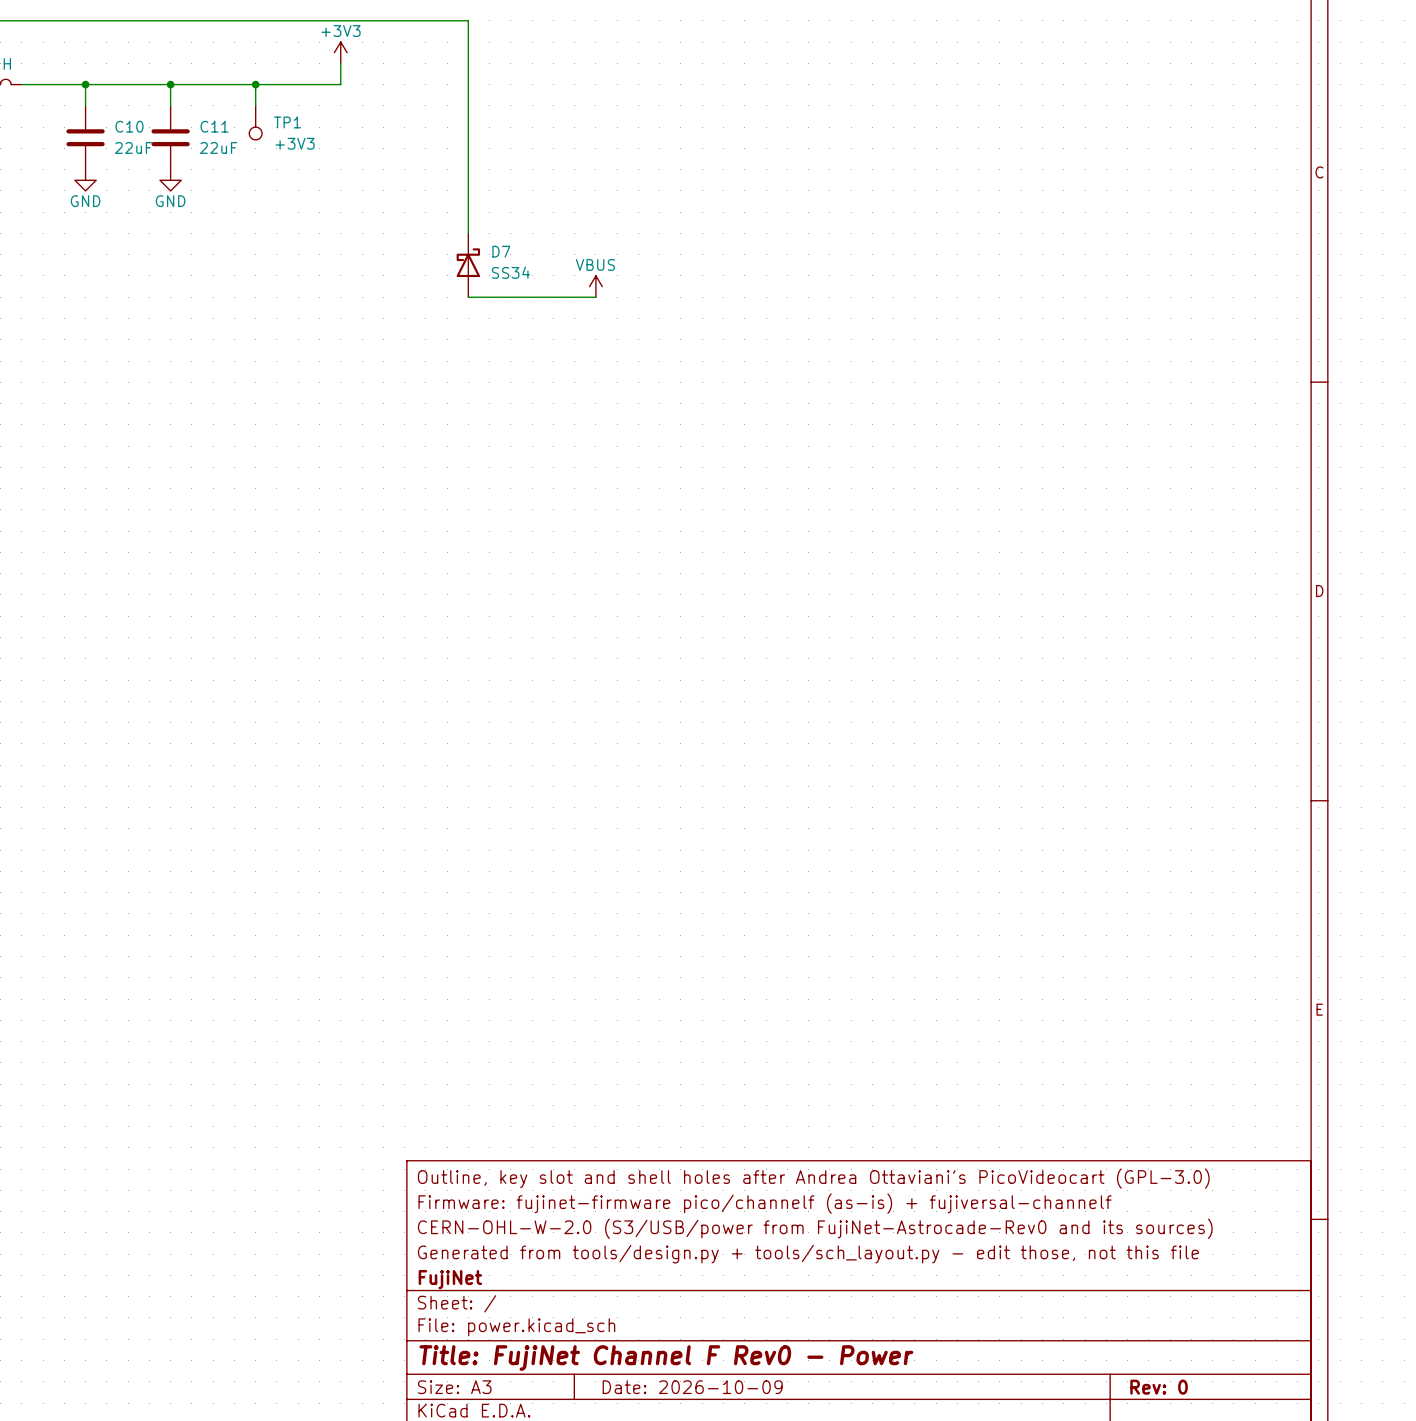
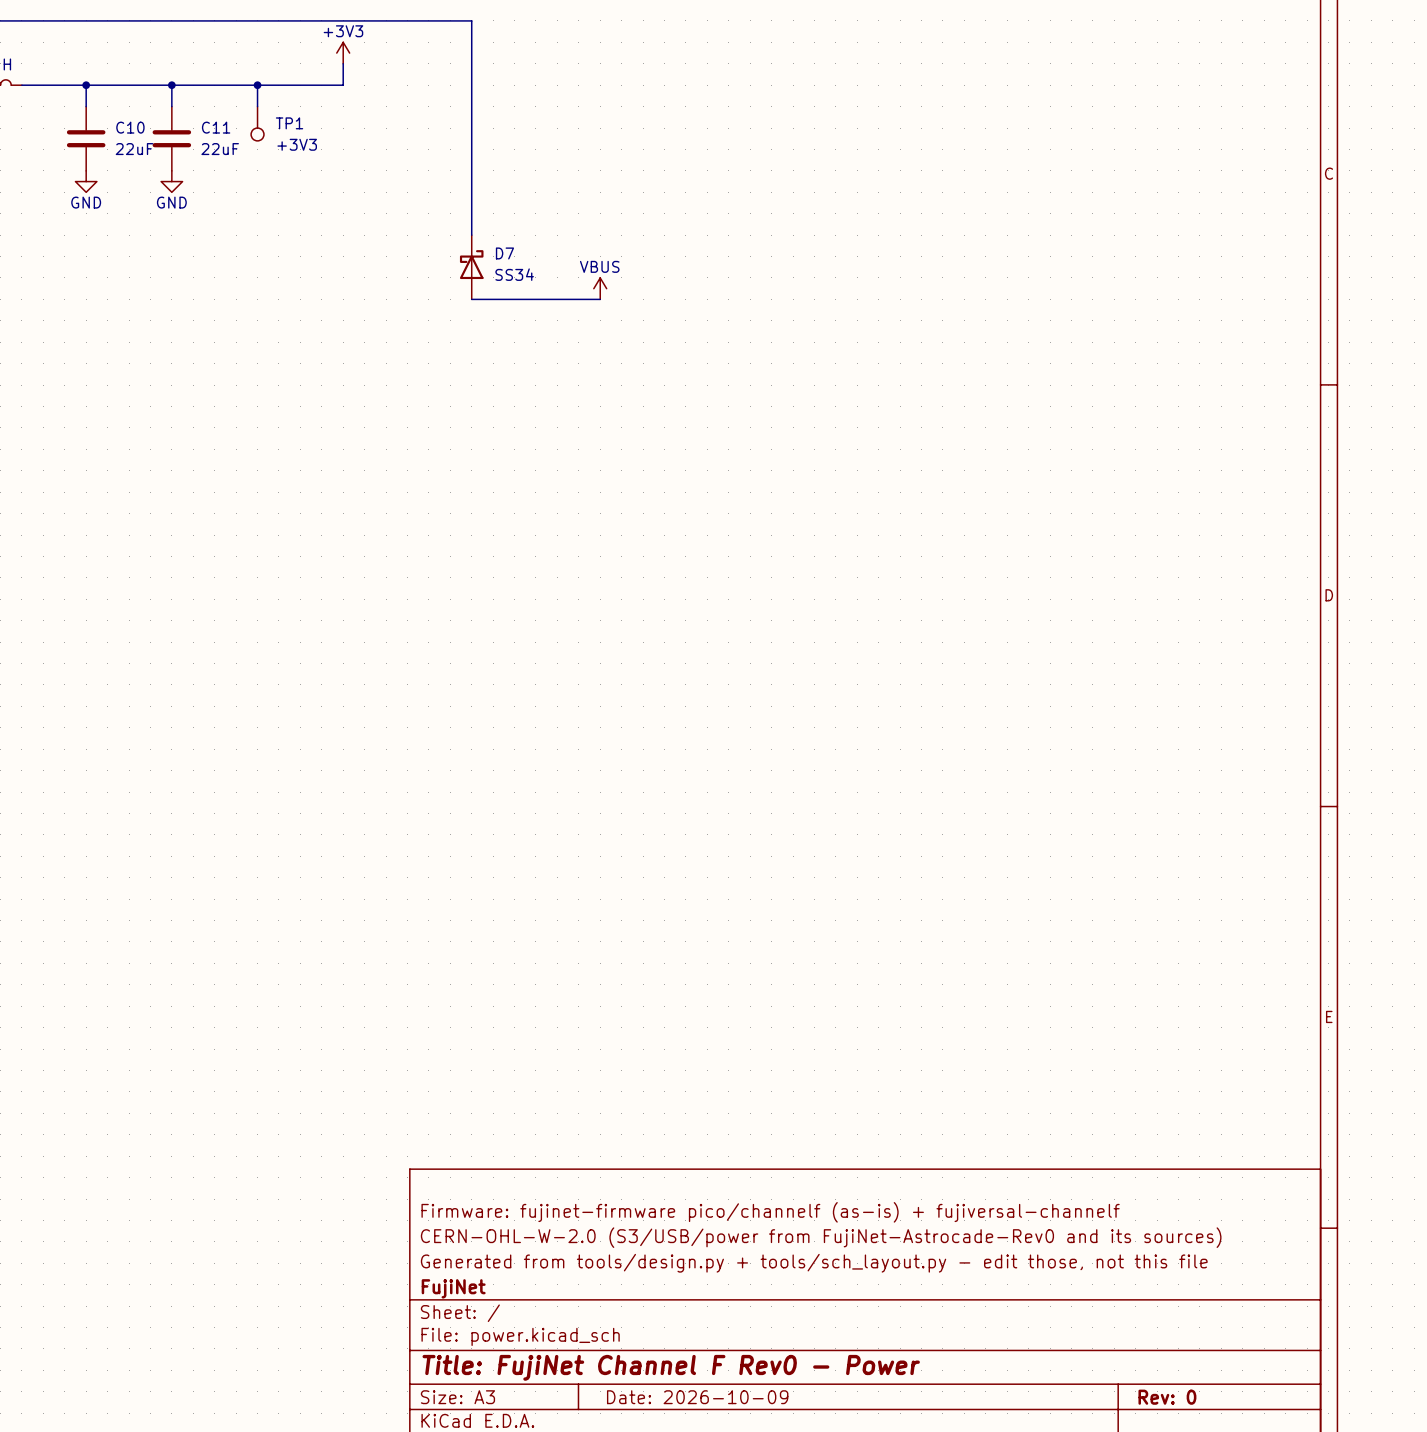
title block: Outline, key slot and shell holes after Andrea Ottaviani's PicoVideocart (GPL-3.0) (813, 1178) -> none

